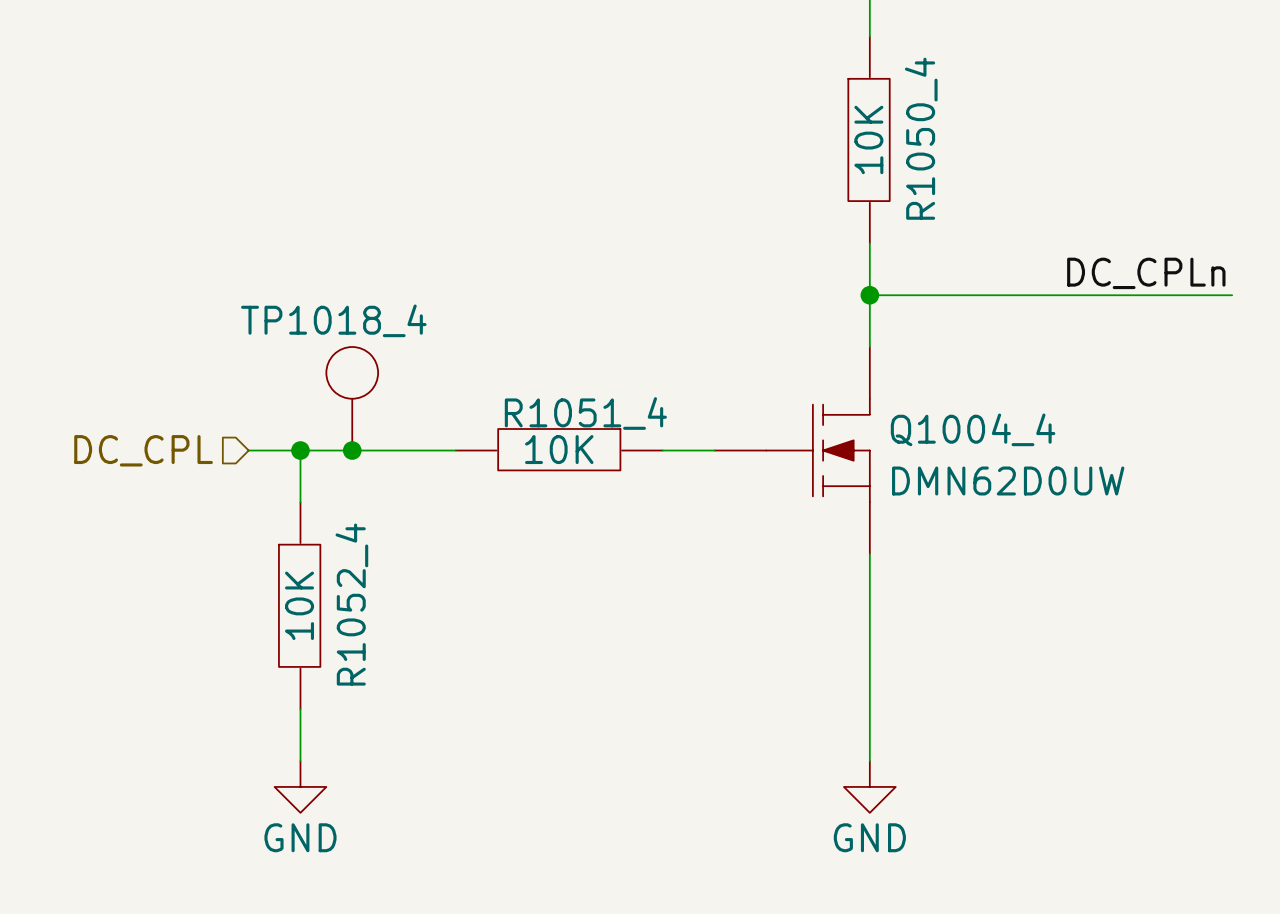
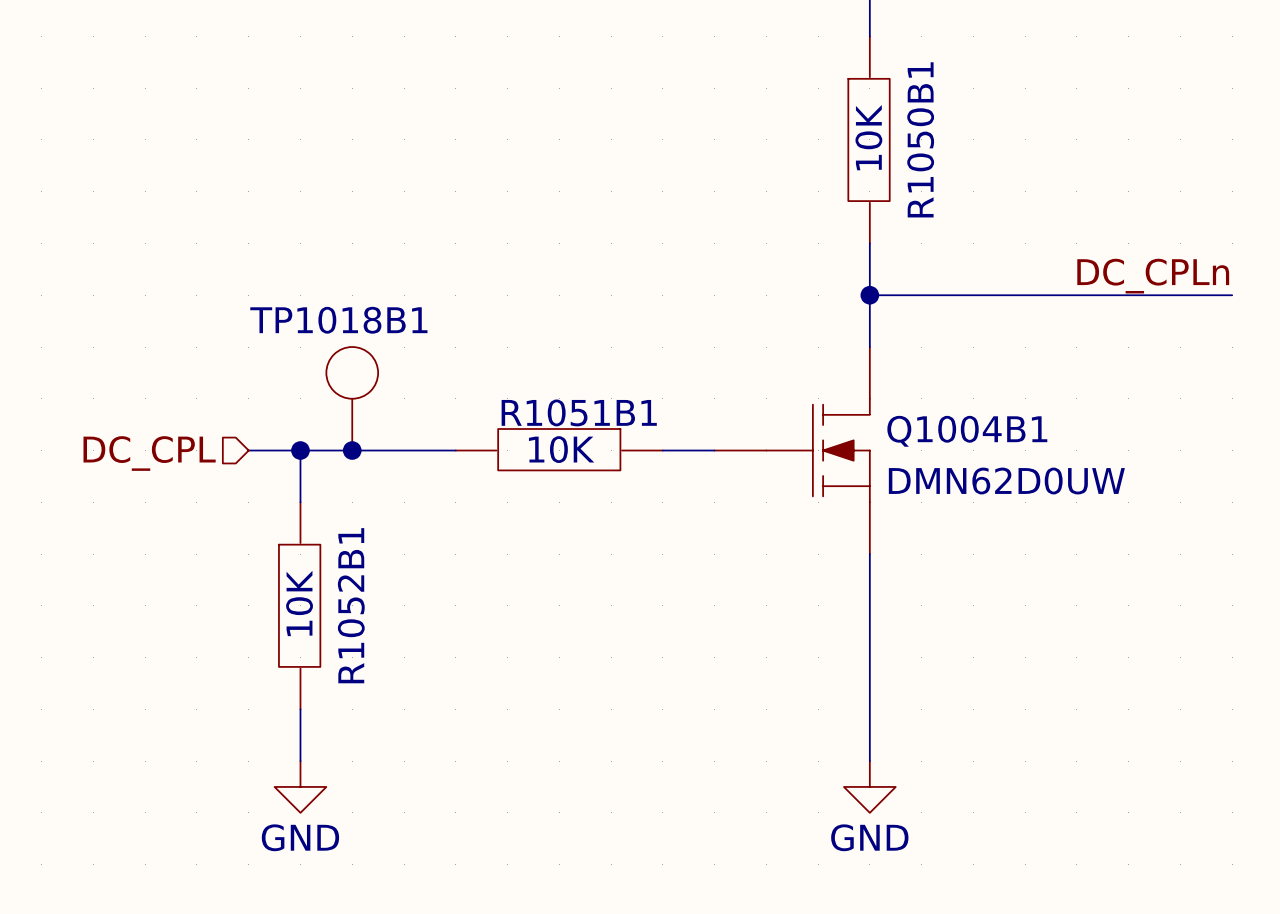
R1050_4 name: R1050_4 (921, 138) -> R1050B1 (920, 139)
TP1018_4 name: TP1018_4 (333, 320) -> TP1018B1 (338, 320)
R1051_4 name: R1051_4 (585, 413) -> R1051B1 (579, 412)
Q1004_4 name: Q1004_4 (973, 429) -> Q1004B1 (967, 431)
R1052_4 name: R1052_4 (351, 604) -> R1052B1 (351, 605)

